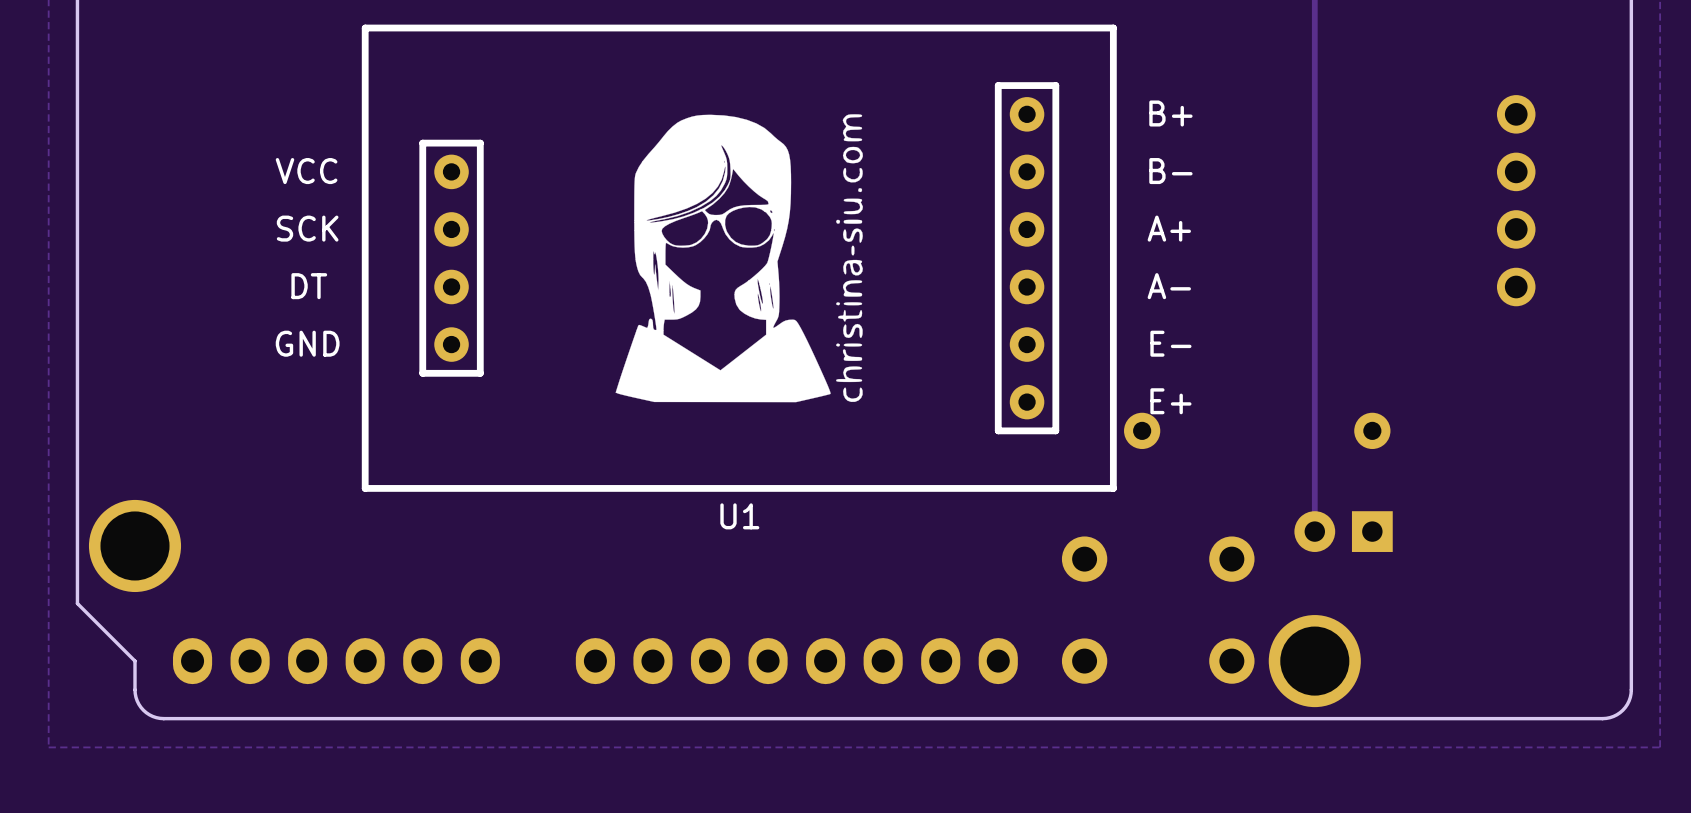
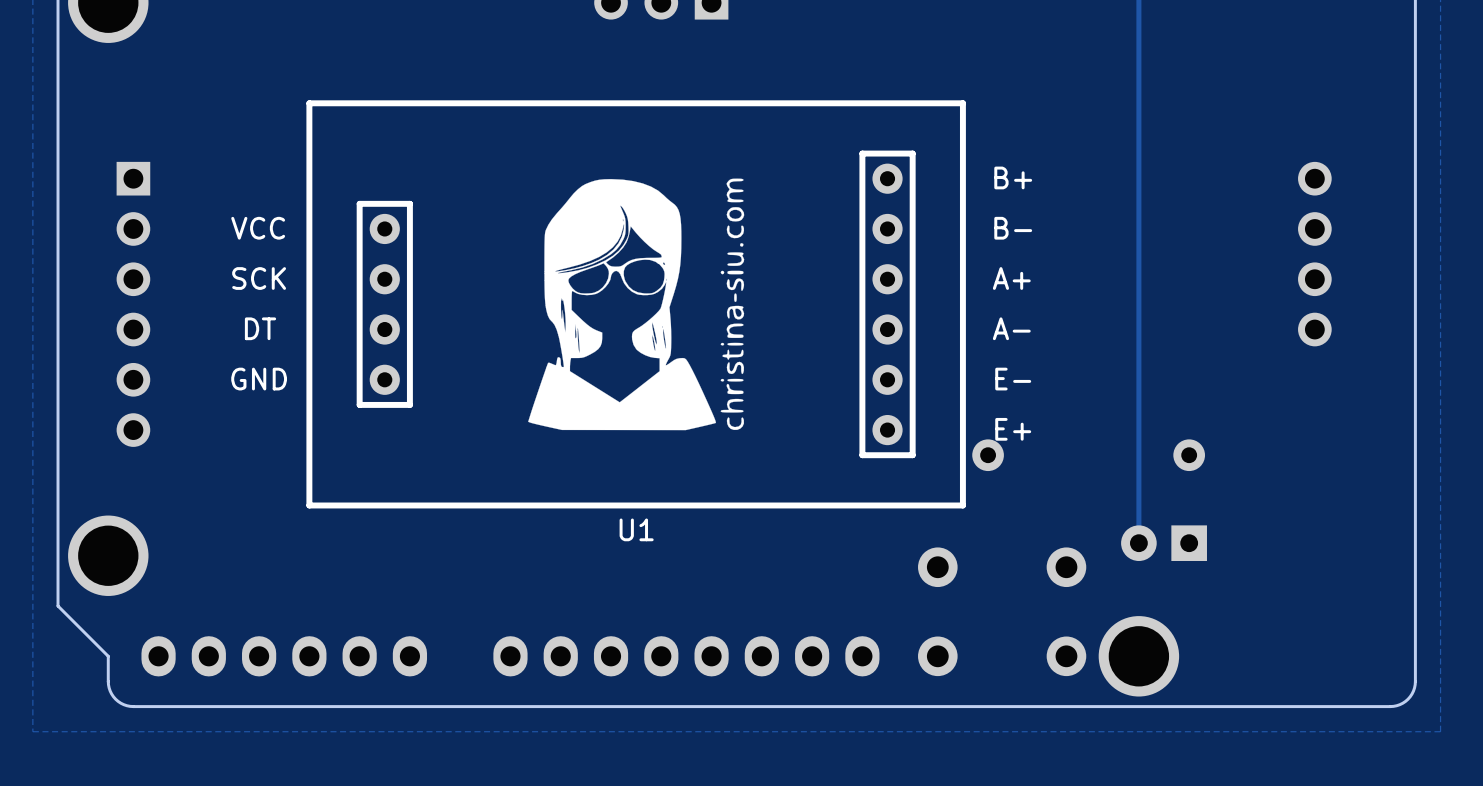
part: none -> (133, 304)

